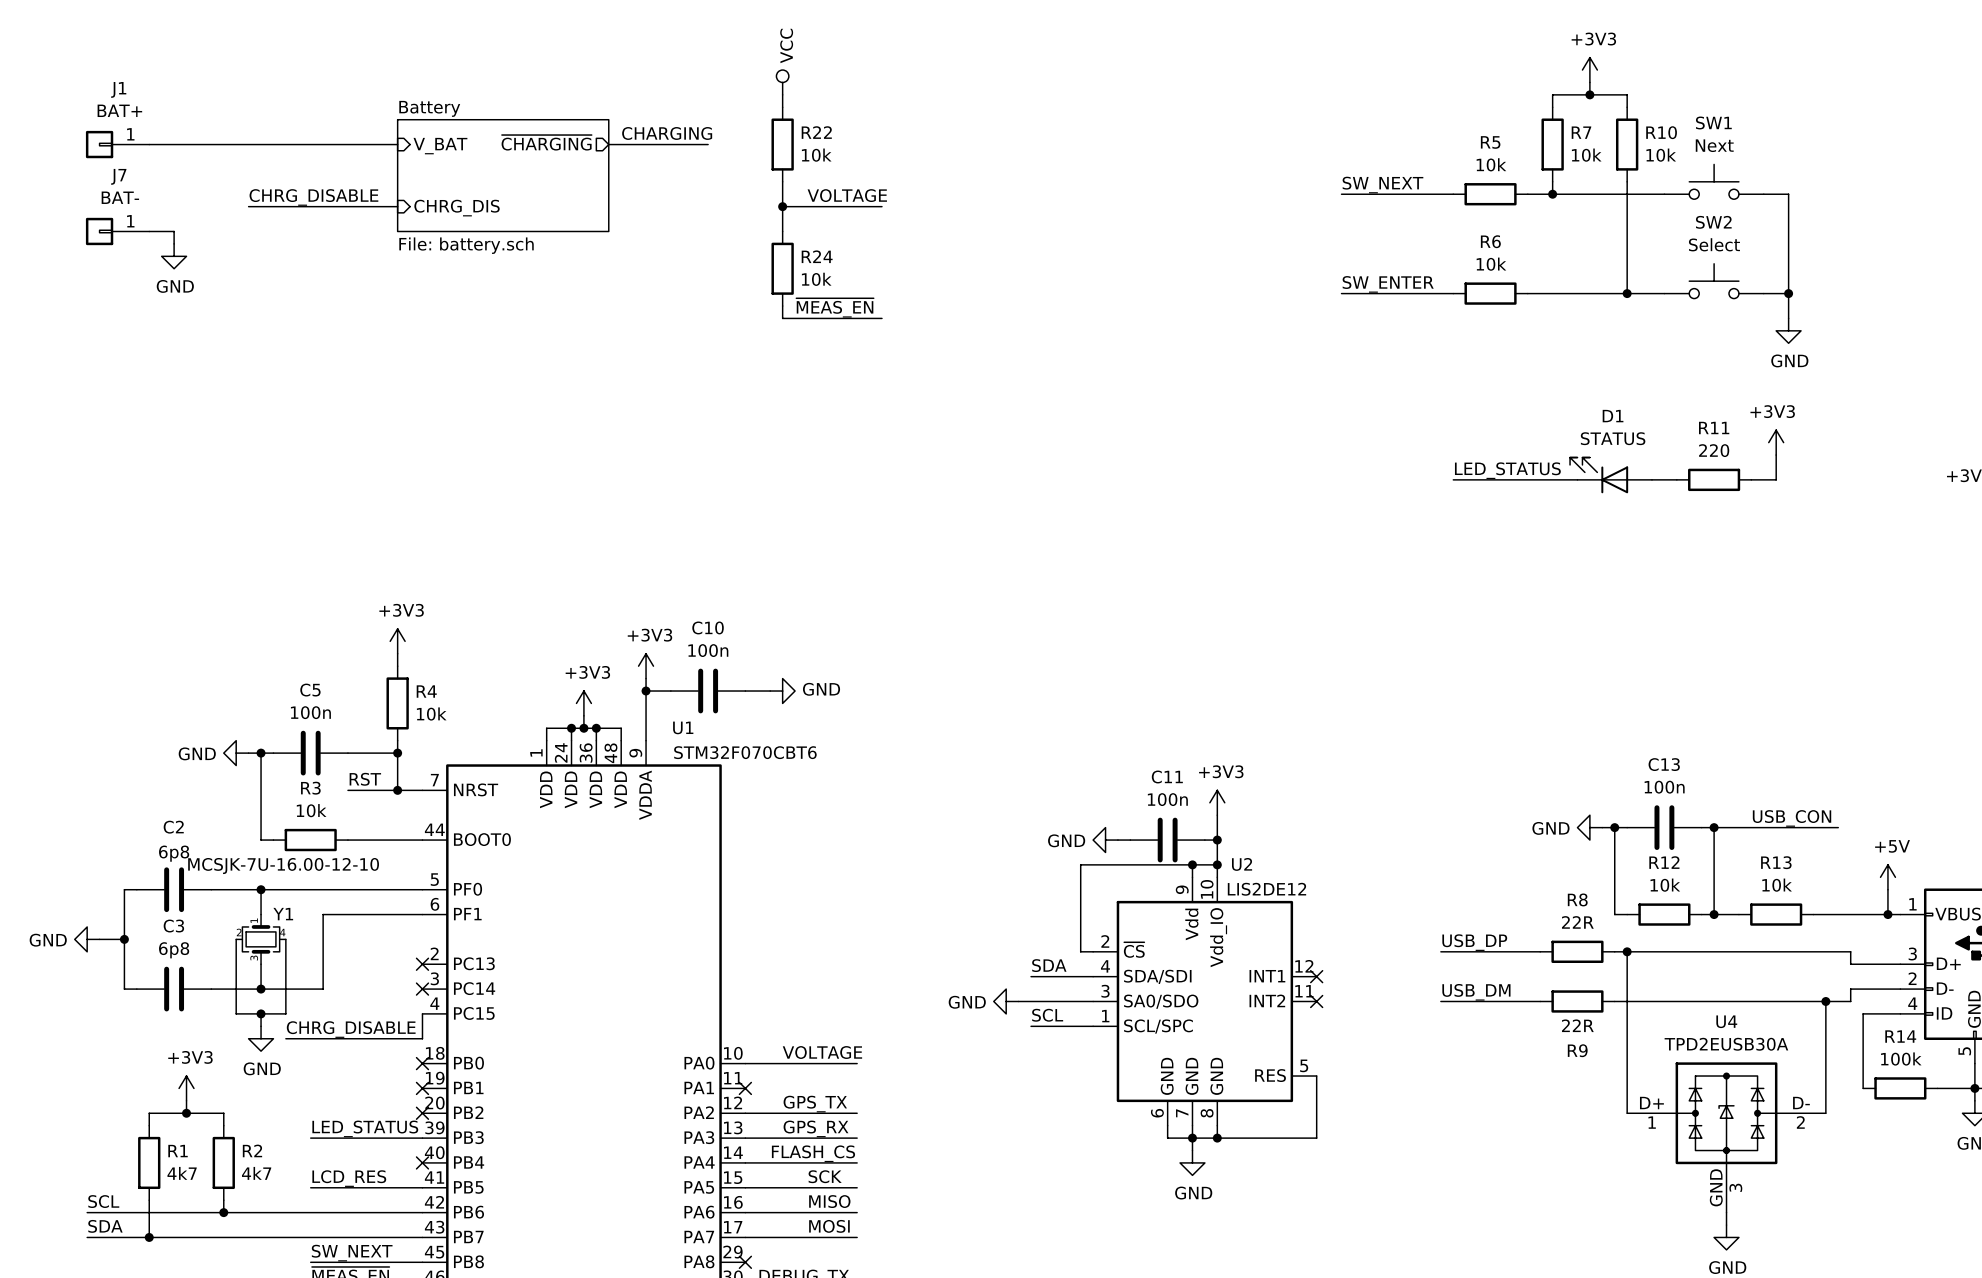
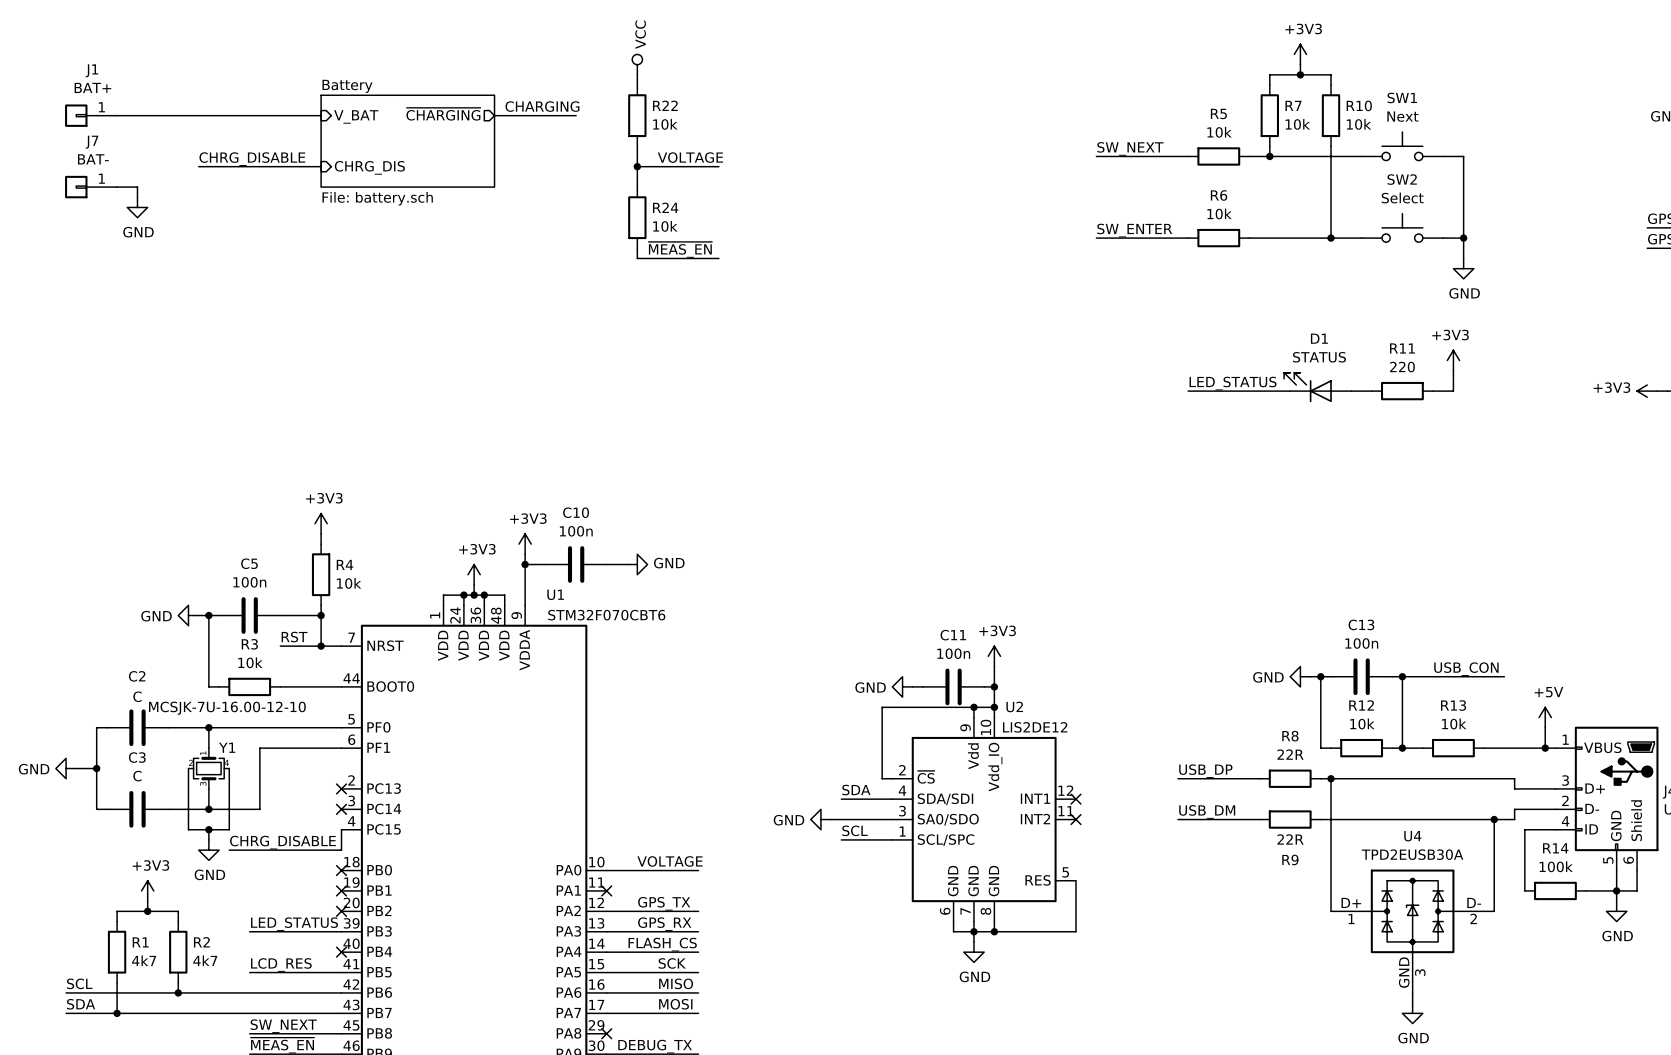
C2 value: 6p8 (174, 853) -> C (137, 696)
C3 value: 6p8 (174, 950) -> C (137, 776)

